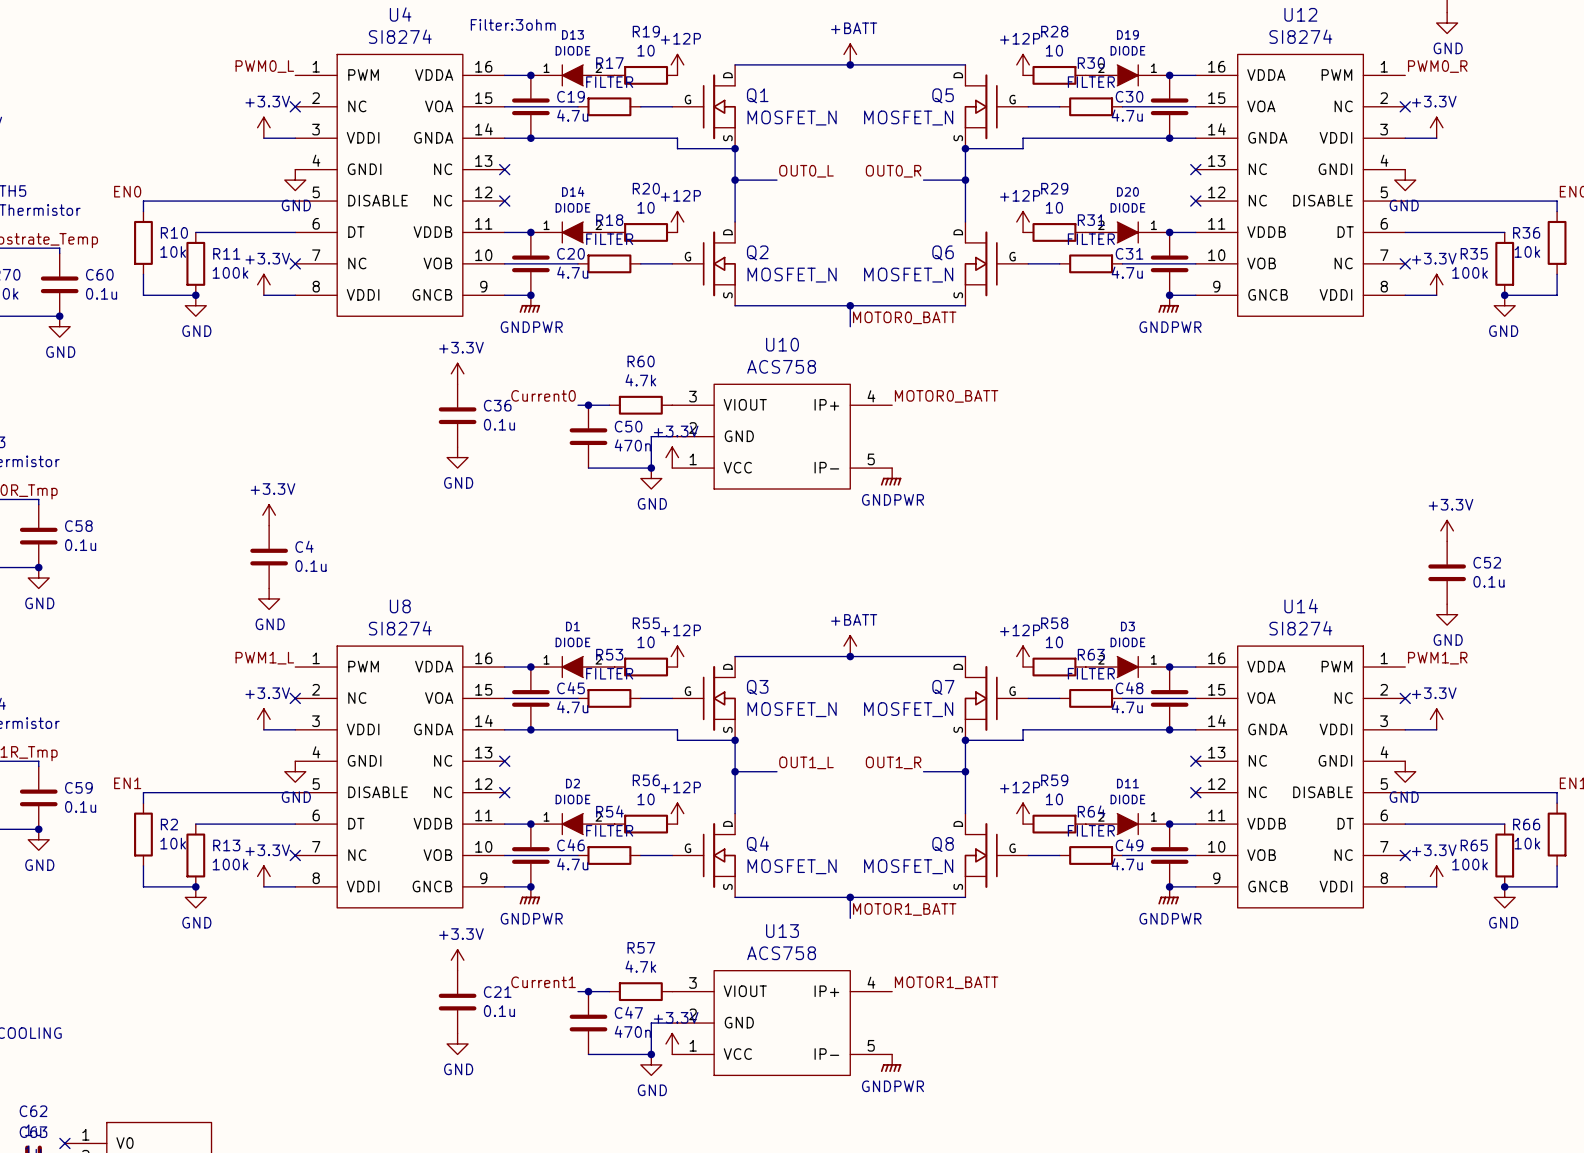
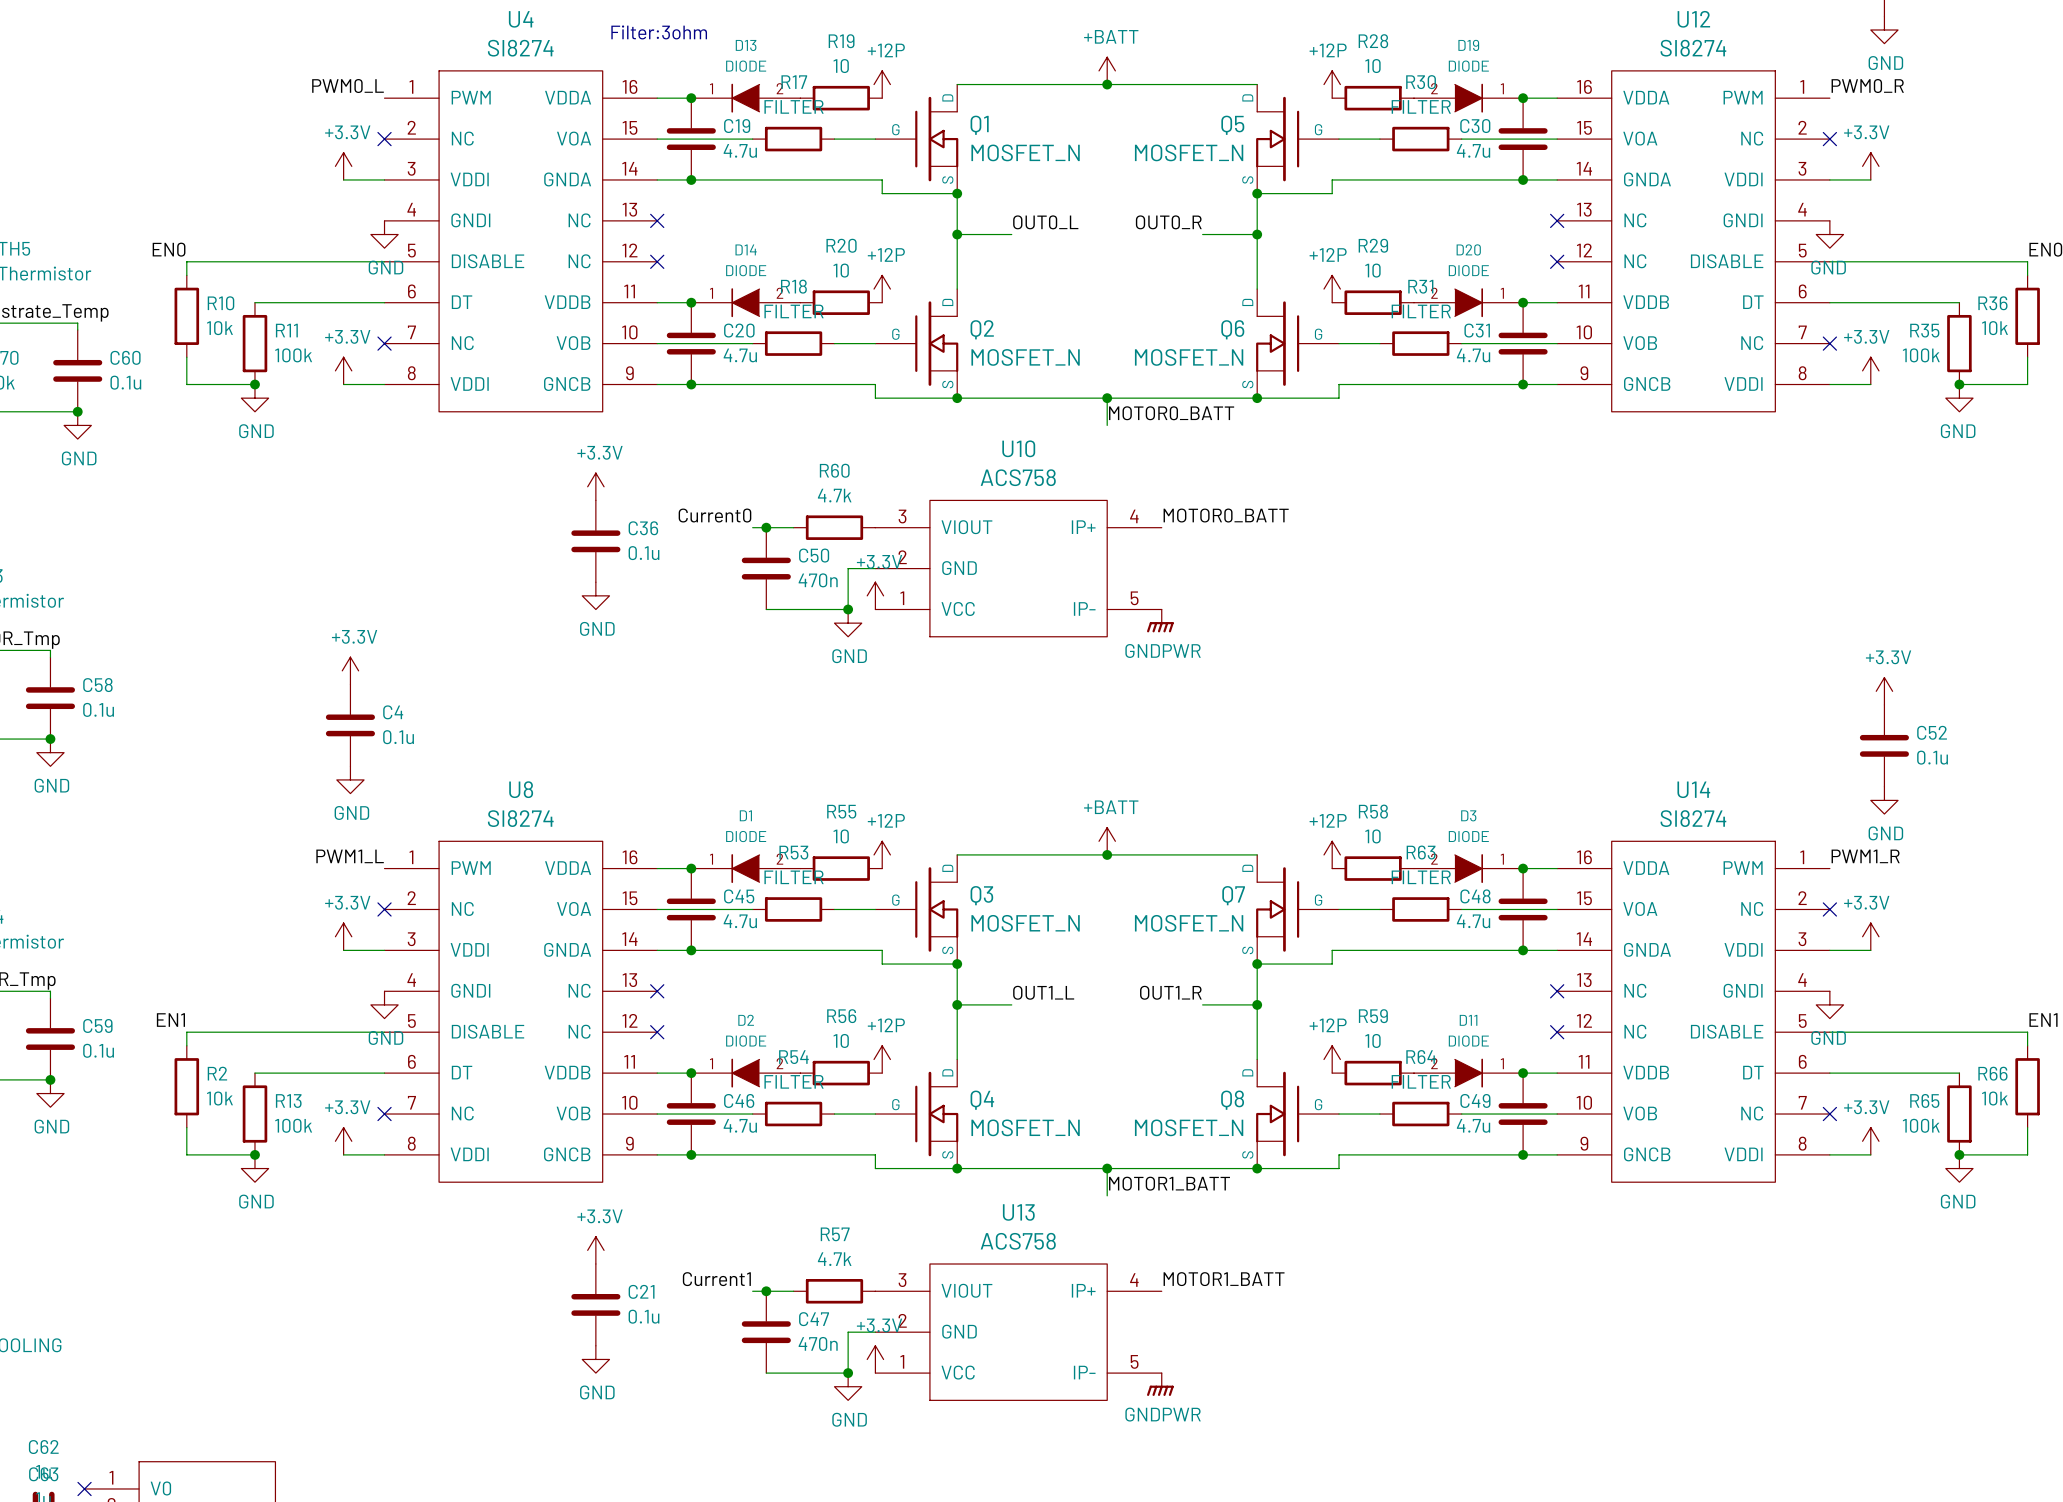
wire: none -> (691, 384) (875, 384) (875, 398) (957, 398)
wire: none -> (1523, 384) (1339, 384) (1339, 398) (1257, 398)
power symbol: GNDPWR (529, 304) -> none
power symbol: GNDPWR (1168, 304) -> none
junction: none -> (957, 398)
junction: none -> (1257, 398)
wire: none -> (691, 1154) (875, 1154) (875, 1168) (957, 1168)
wire: none -> (1523, 1154) (1339, 1154) (1339, 1168) (1257, 1168)
power symbol: GNDPWR (529, 895) -> none
power symbol: GNDPWR (1168, 895) -> none
junction: none -> (957, 1168)
junction: none -> (1257, 1168)

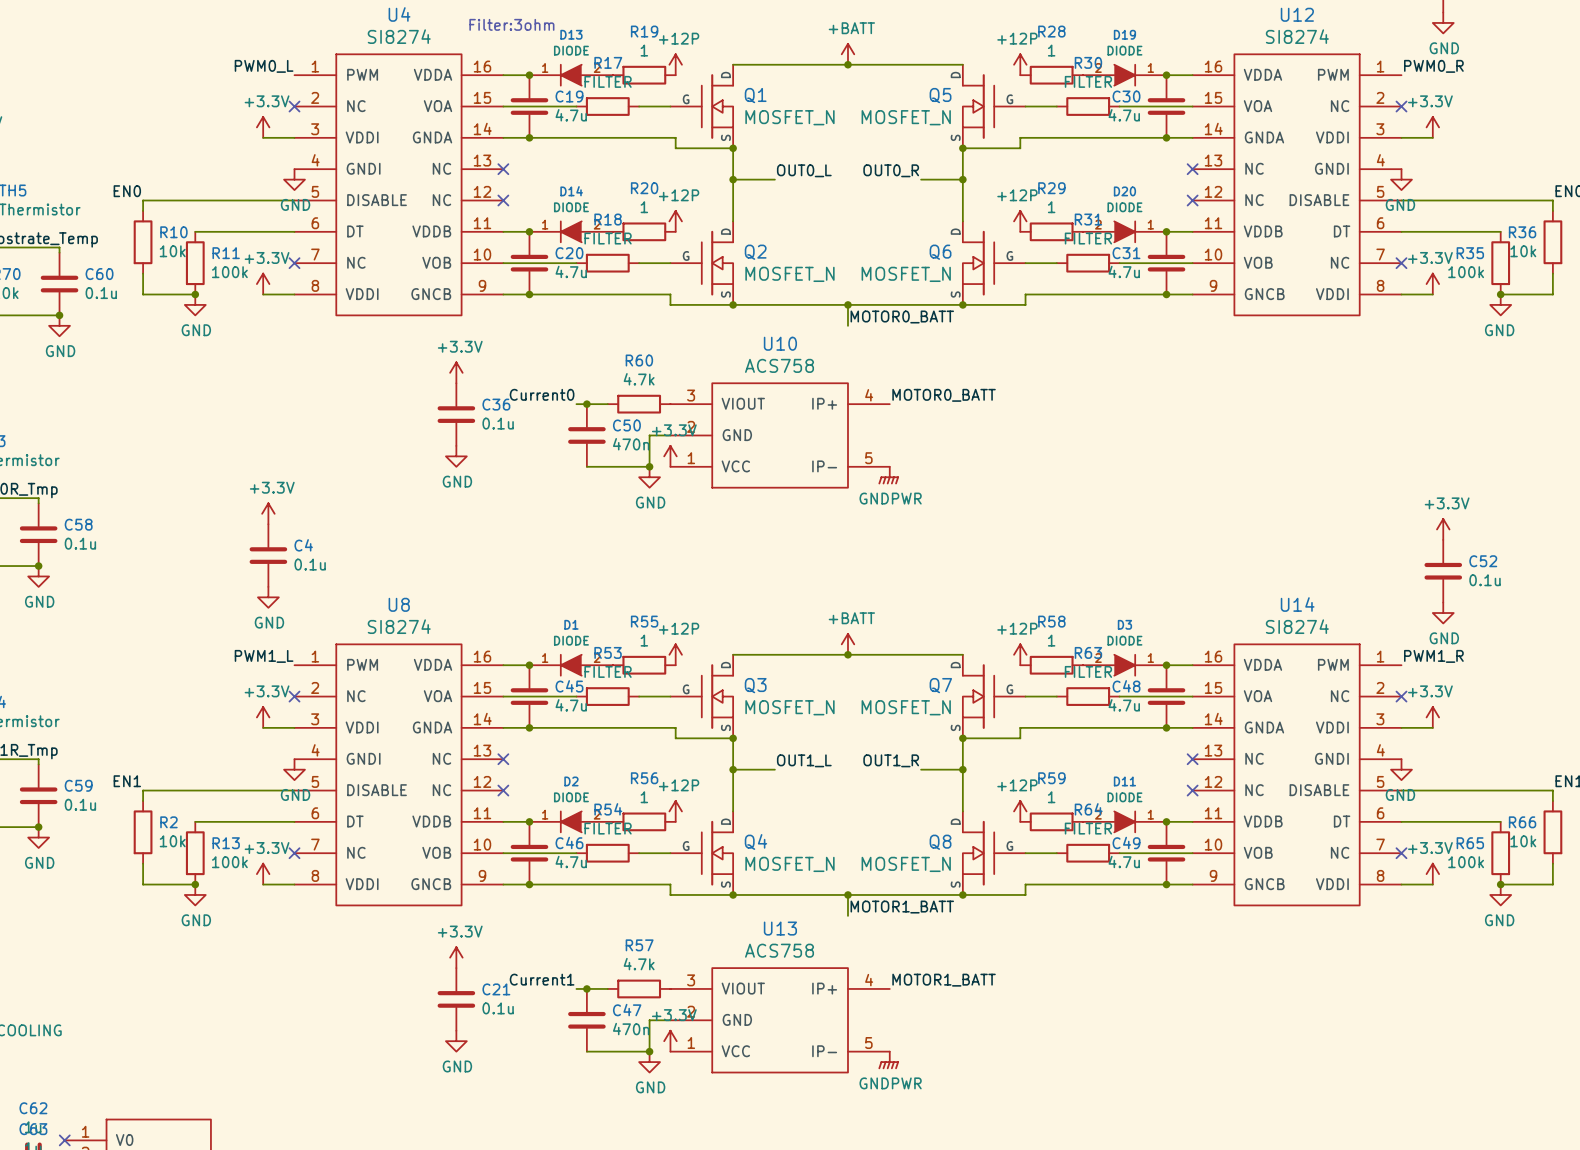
R19 value: 10 (841, 66) -> 1 (644, 50)
R28 value: 10 (1372, 66) -> 1 (1051, 50)
R20 value: 10 (841, 270) -> 1 (644, 207)
R29 value: 10 (1372, 270) -> 1 (1051, 207)
R55 value: 10 (841, 836) -> 1 (644, 640)
R58 value: 10 (1372, 836) -> 1 (1051, 640)
R56 value: 10 (841, 1040) -> 1 (644, 797)
R59 value: 10 (1372, 1040) -> 1 (1051, 797)

